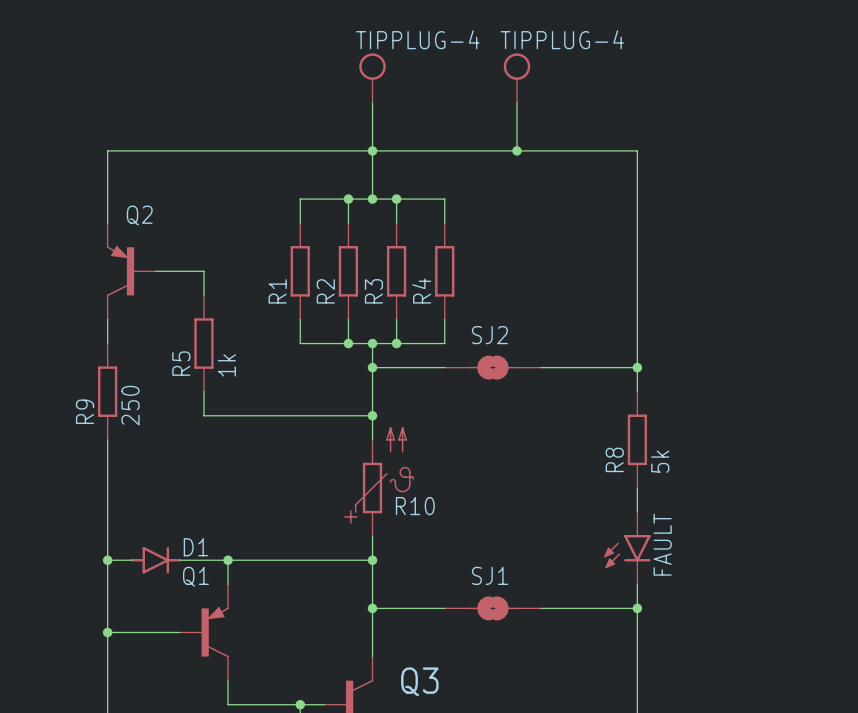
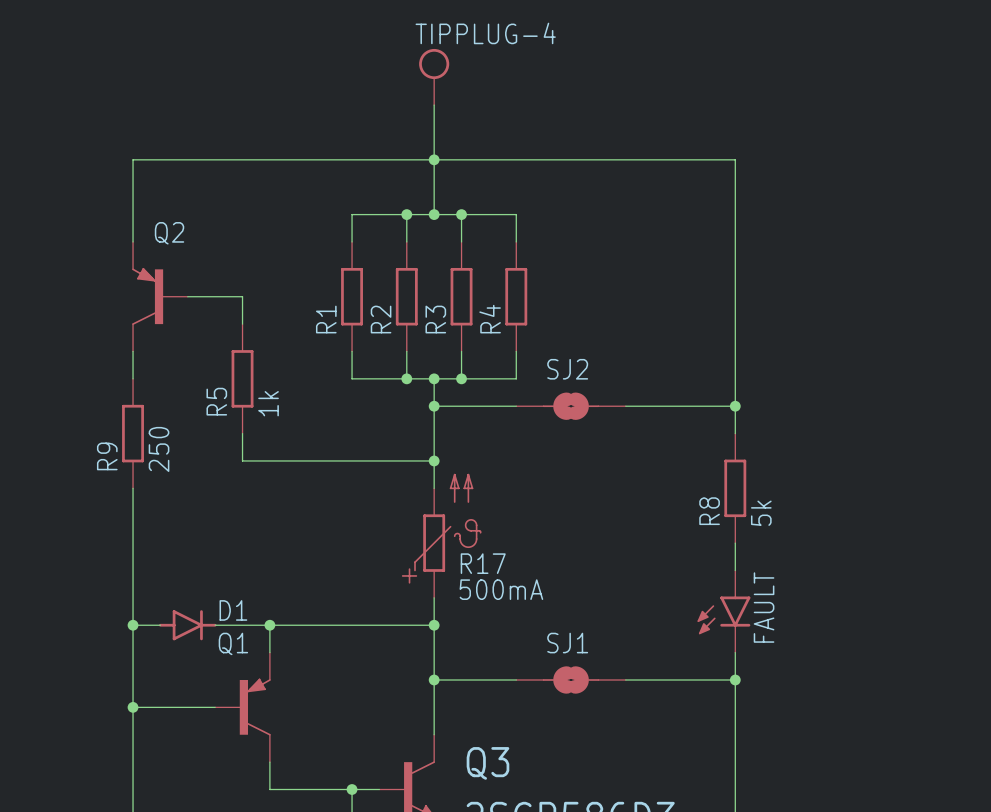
part: TIPPLUG-4 (516, 78) -> none
wire: (516, 102) (516, 150) -> none
junction: (516, 150) -> none
R10 name: R10 (415, 506) -> R17 (483, 563)
R10 value: none -> 500mA (501, 589)

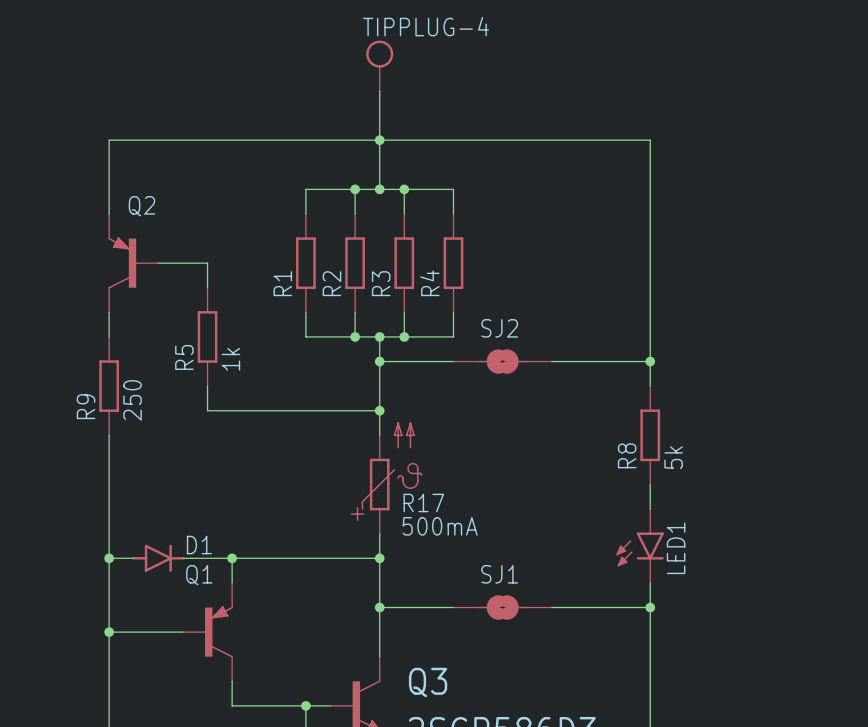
FAULT name: FAULT (764, 607) -> LED1 (676, 548)

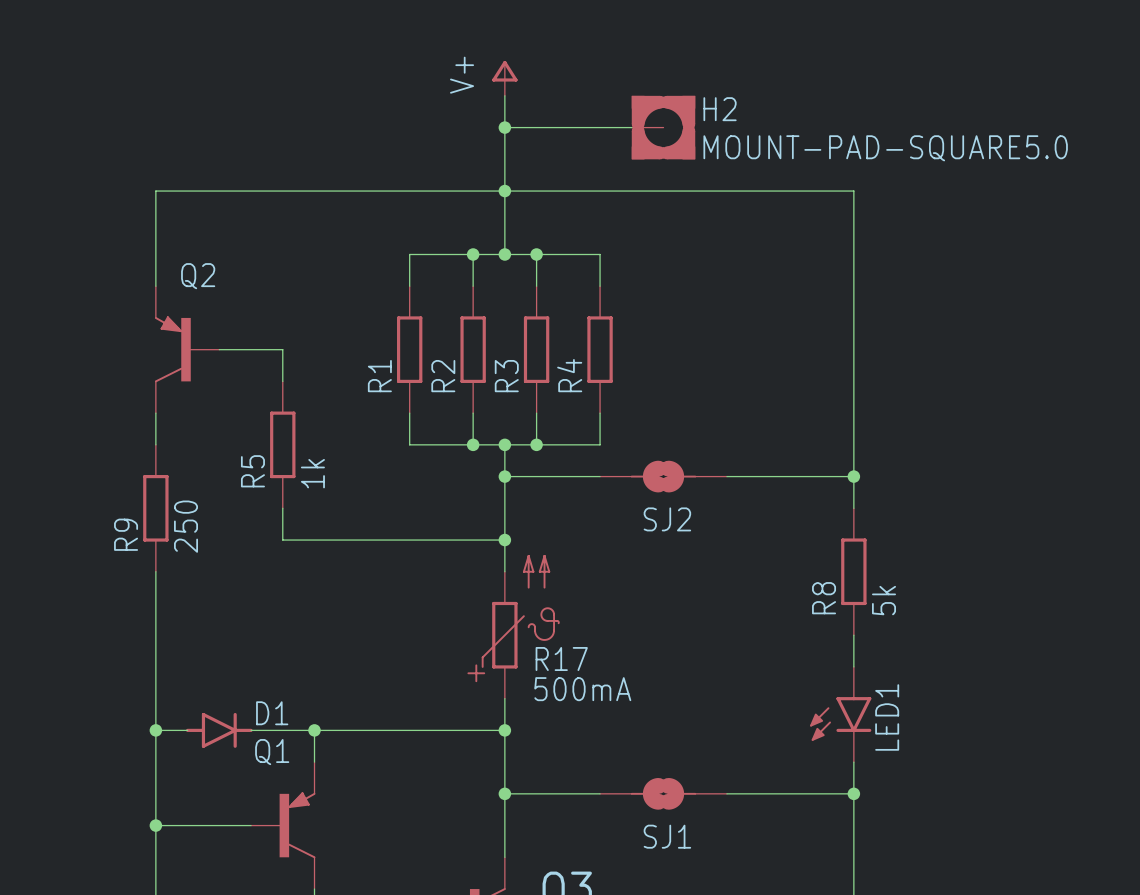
power symbol: none -> V+ (504, 78)
part: TIPPLUG-4 (379, 65) -> none
wire: none -> (504, 95) (504, 127) (631, 127)
junction: none -> (504, 127)
H2: none -> MOUNT-PAD-SQUARE5.0 (663, 127)
SJ2 name position: SJ2 (499, 328) -> SJ2 (667, 519)
SJ1 name position: SJ1 (499, 574) -> SJ1 (667, 836)

